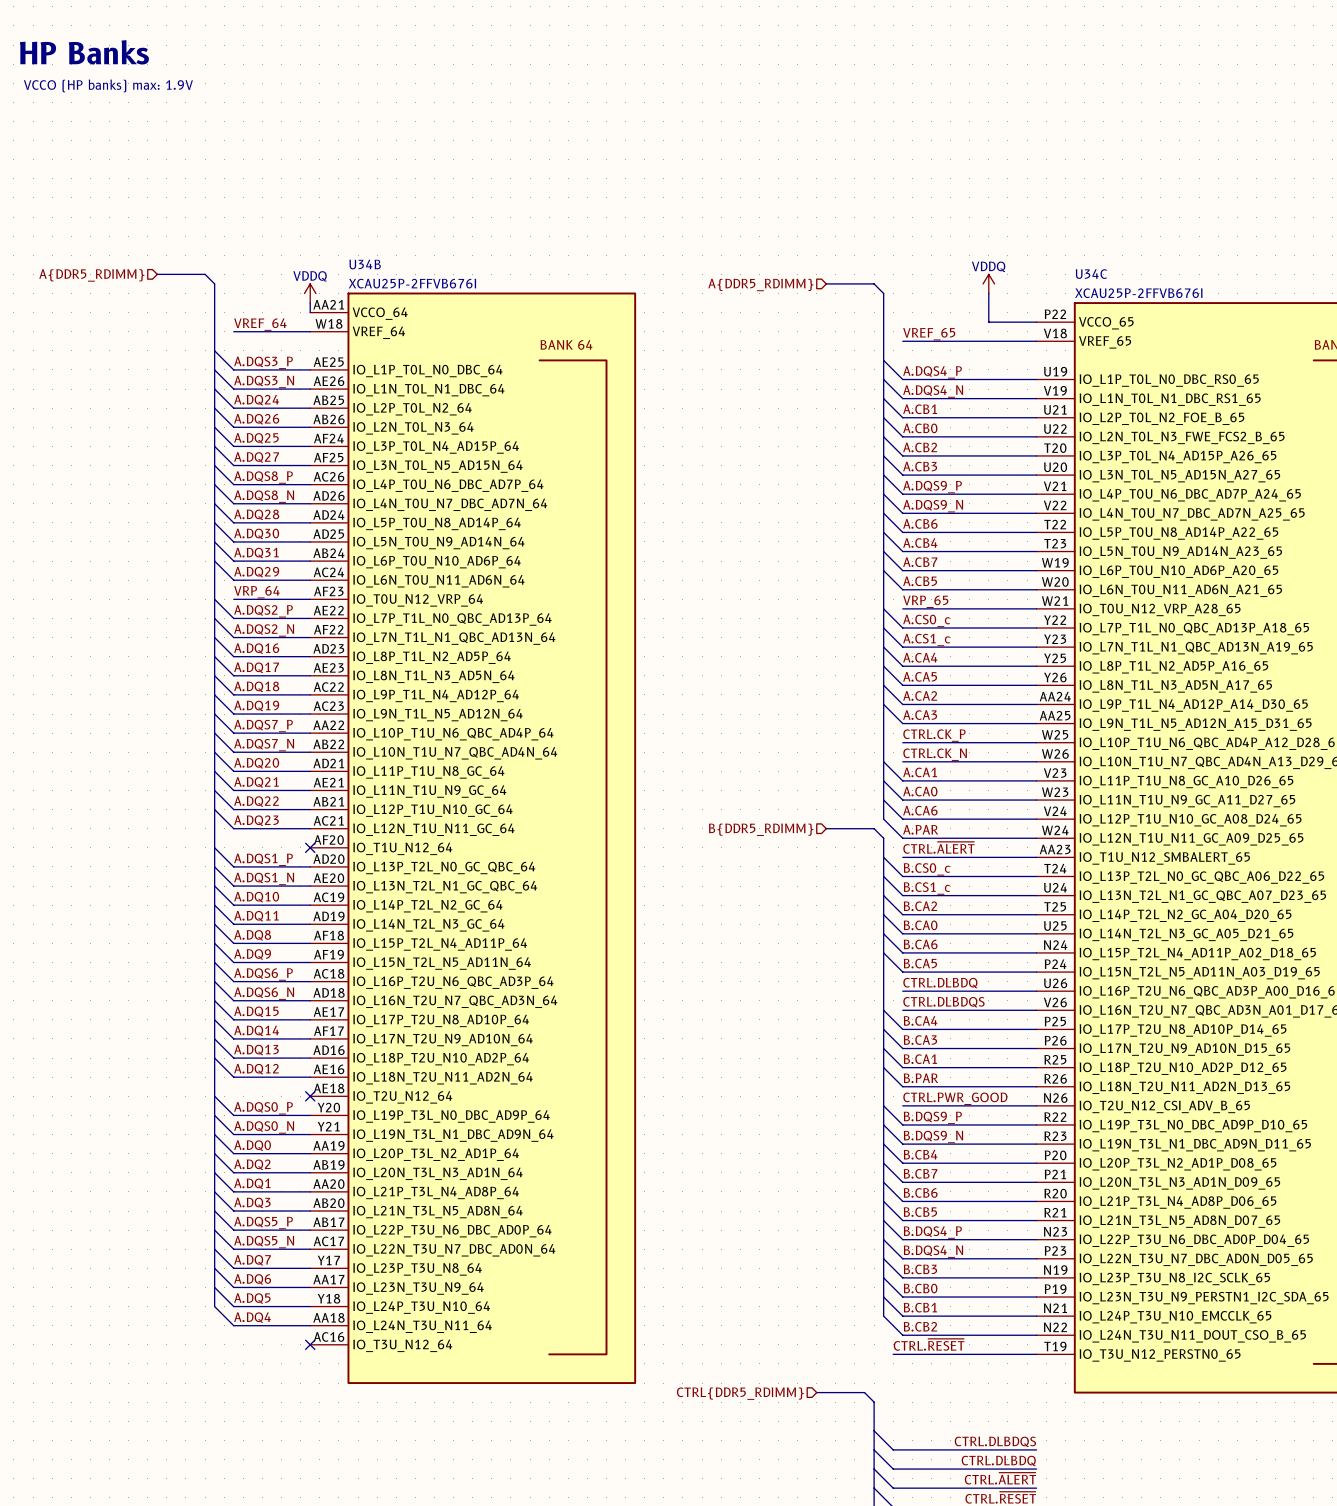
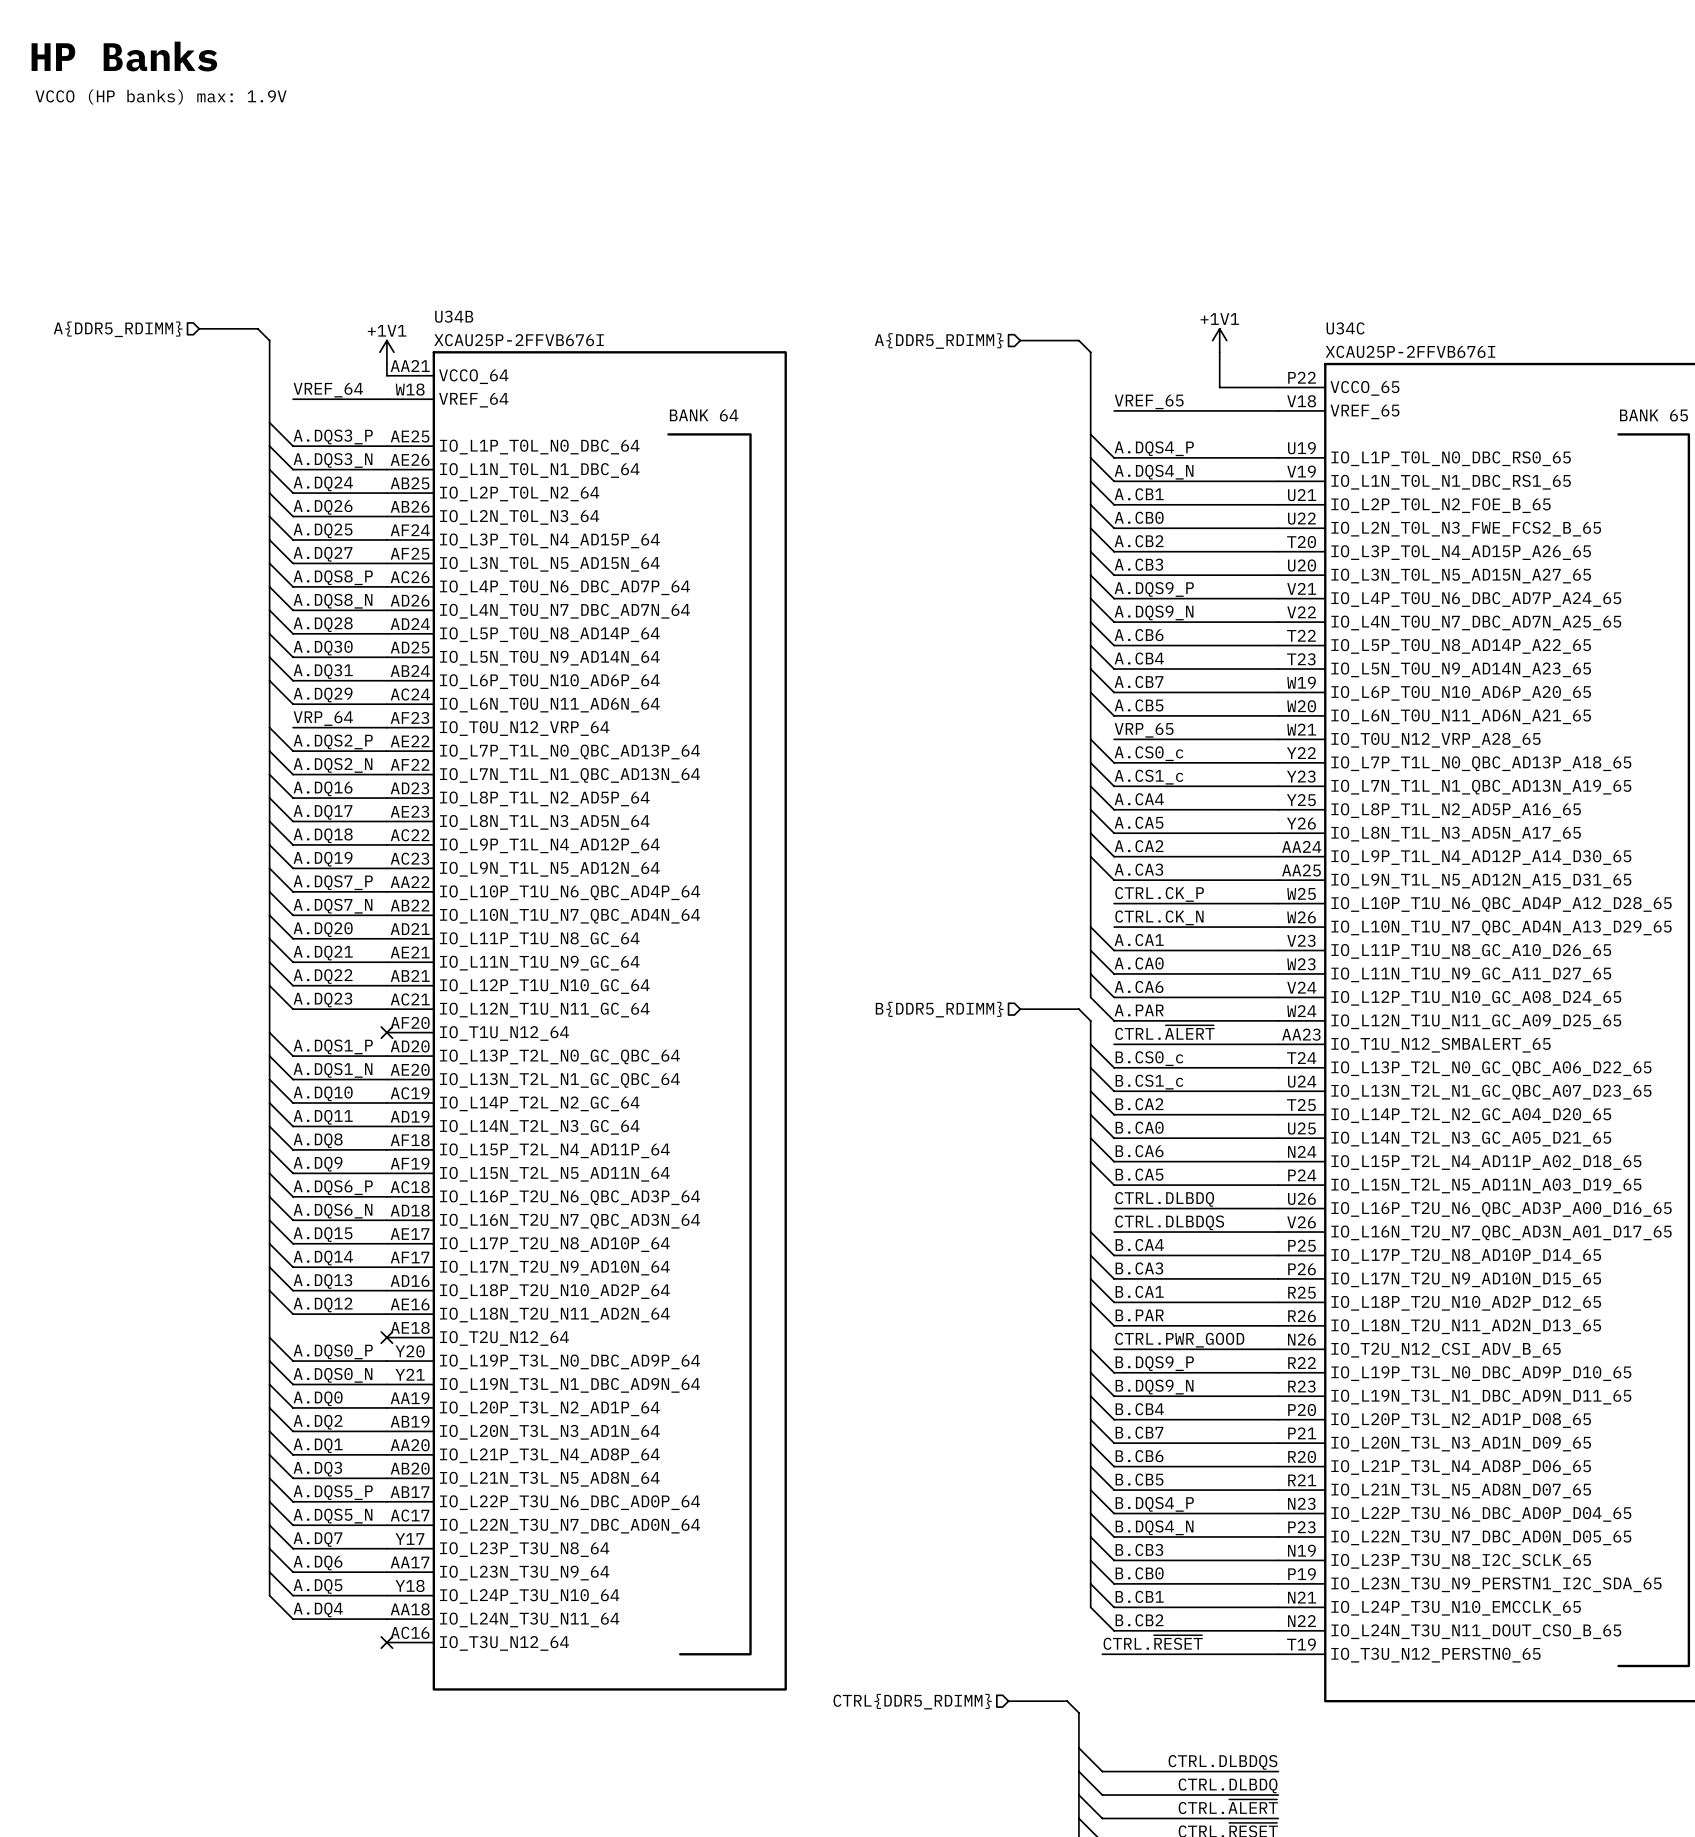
power symbol: VDDQ (988, 283) -> +1V1 (1219, 340)
power symbol: VDDQ (310, 293) -> +1V1 (386, 352)

